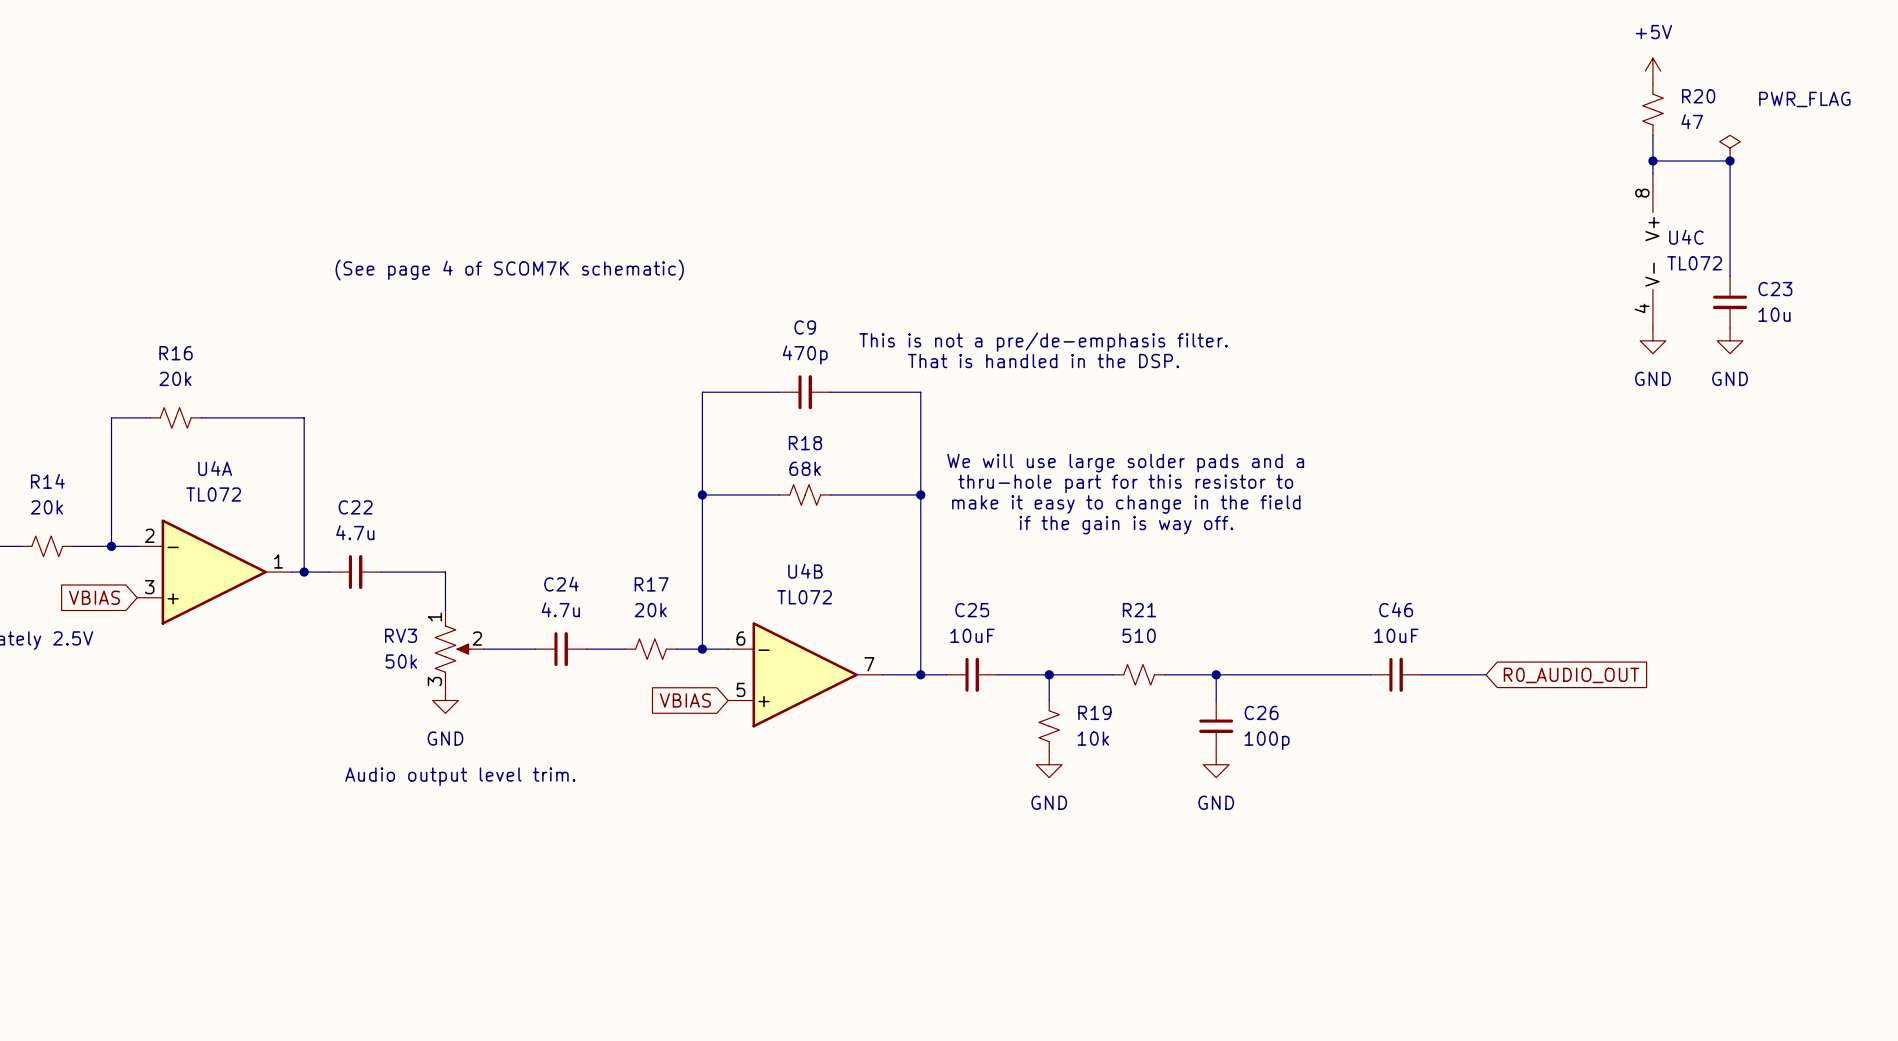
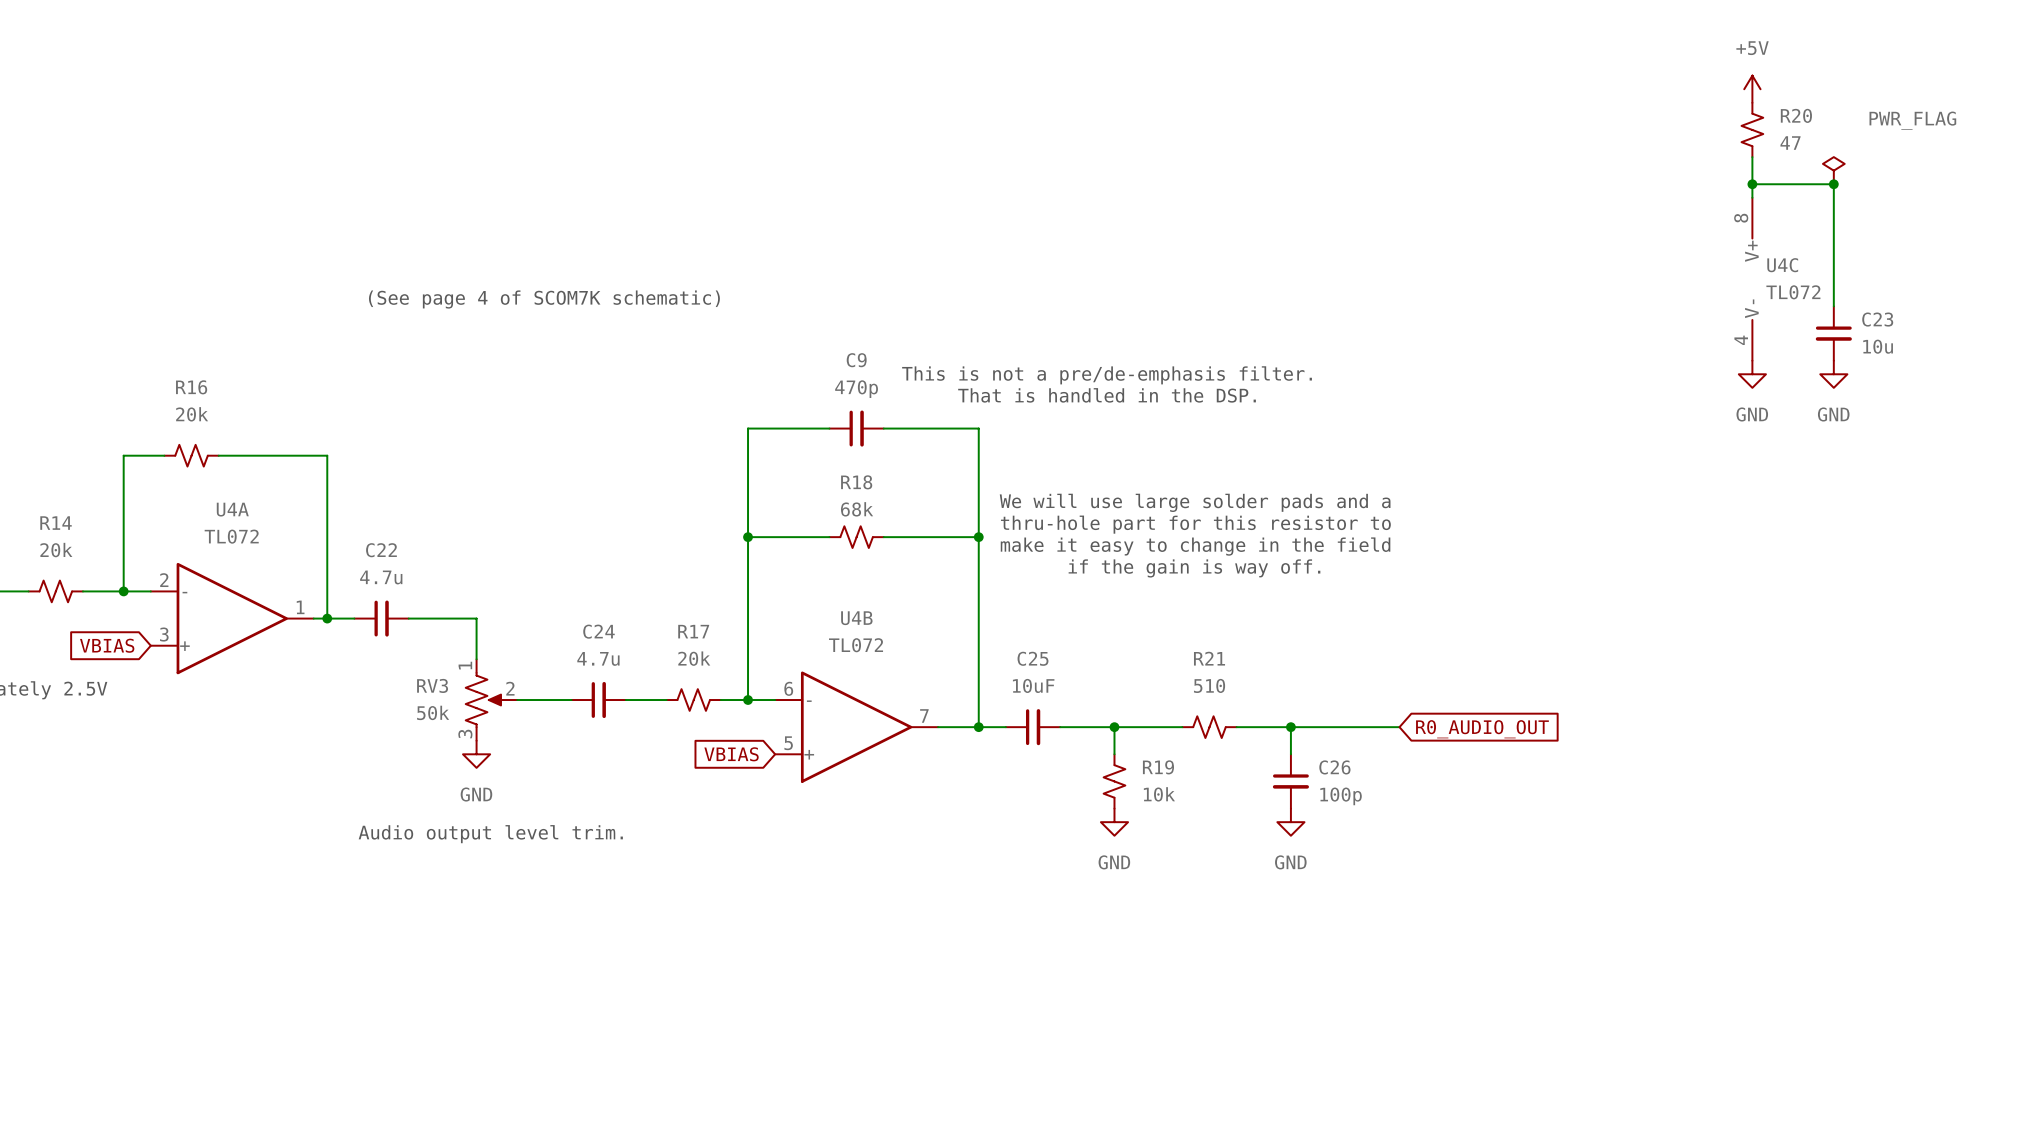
wire: (1318, 674) (1370, 674) -> none
C46: 10uF (1396, 674) -> none
wire: (1421, 674) (1485, 674) -> none
global label position: R0_AUDIO_OUT (1571, 675) -> R0_AUDIO_OUT (1482, 729)

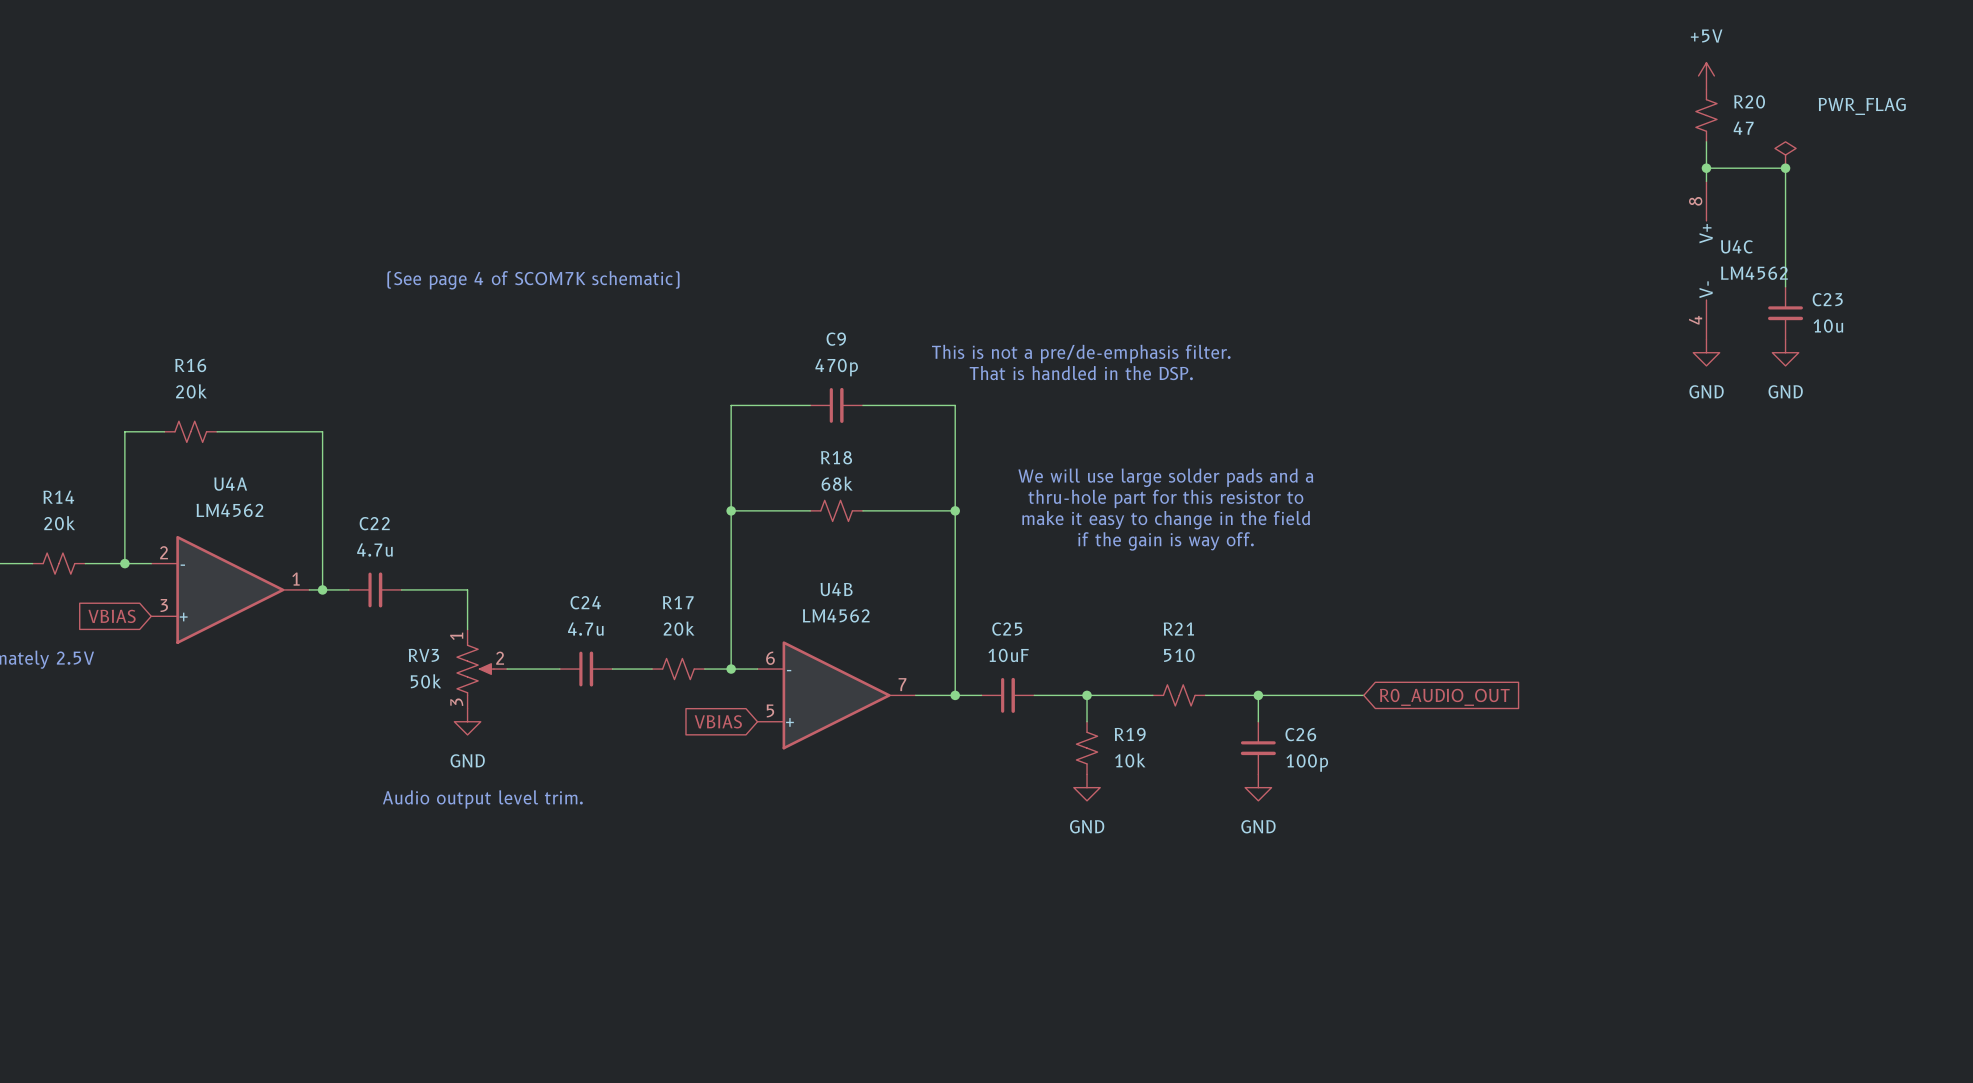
U4C value: TL072 (1793, 292) -> LM4562 (1754, 273)
U4A value: TL072 (231, 536) -> LM4562 (229, 510)
U4B value: TL072 (856, 645) -> LM4562 (836, 615)

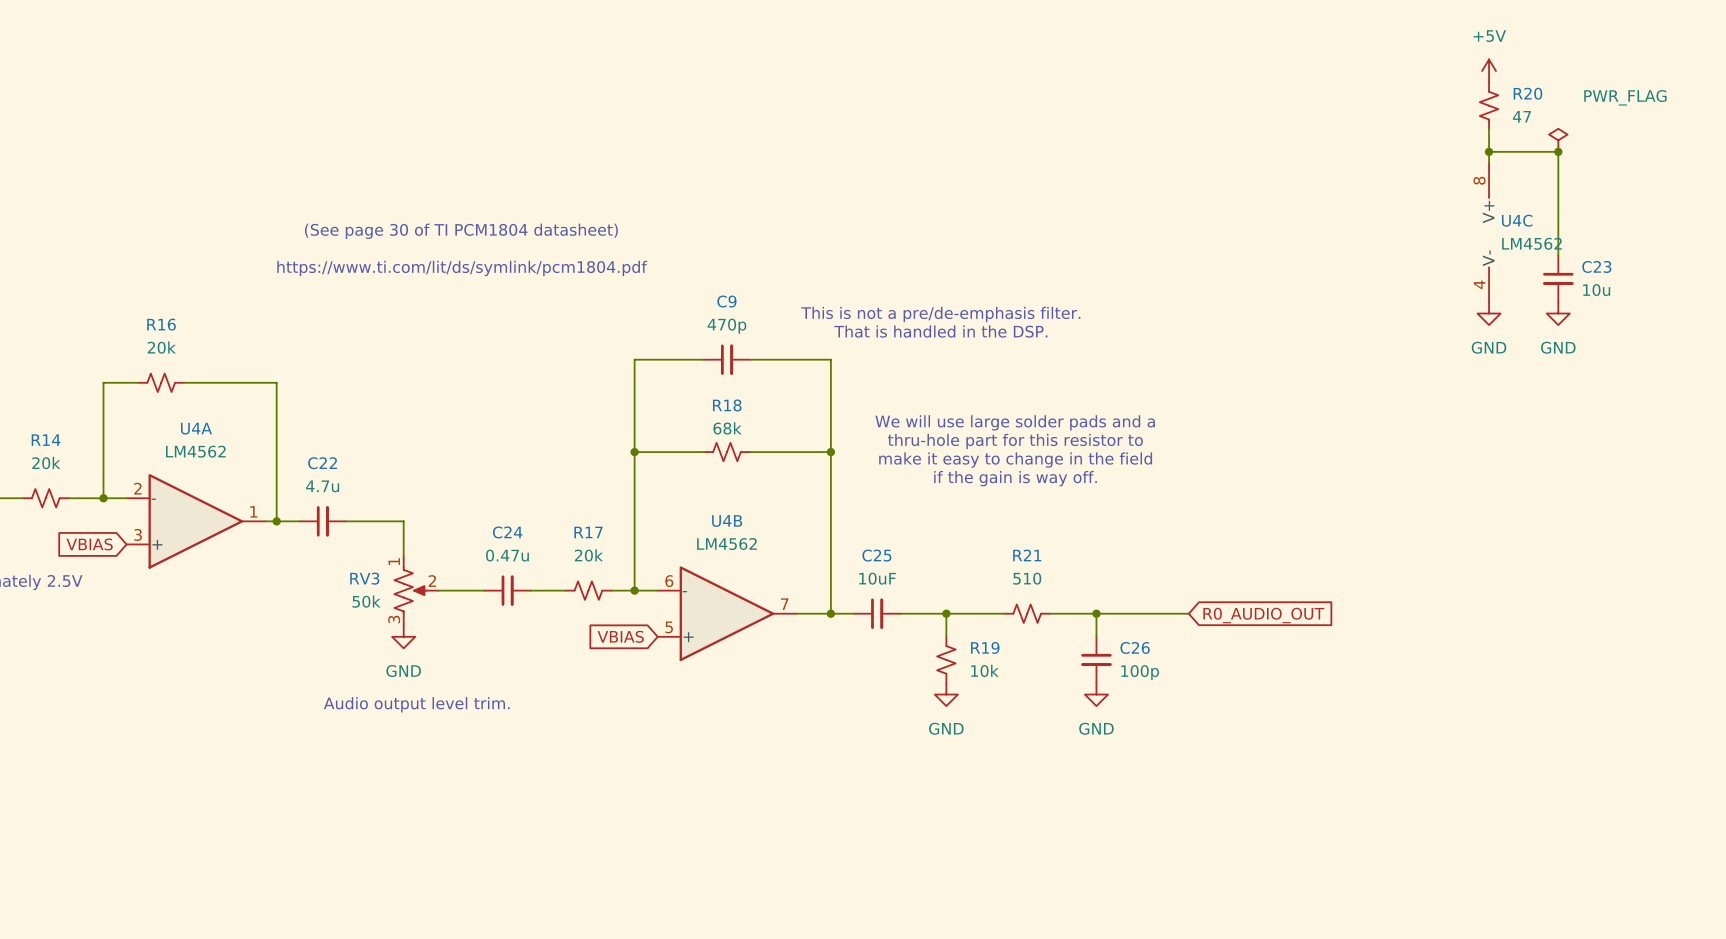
text: (See page 4 of SCOM7K schematic) (533, 280) -> (See page 30 of TI PCM1804 datasheet) (461, 231)
text: none -> https://www.ti.com/lit/ds/symlink/pcm1804.pdf (462, 268)
C24 value: 4.7u (585, 629) -> 0.47u (507, 555)

